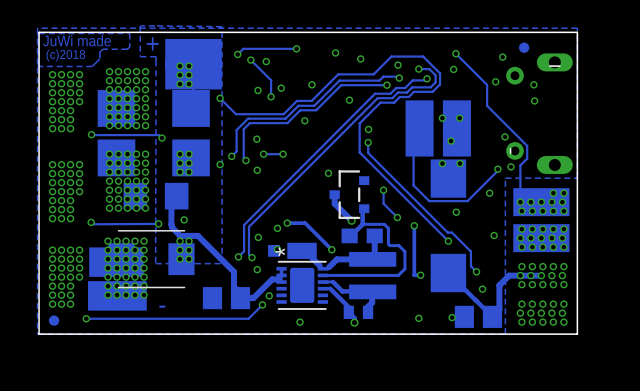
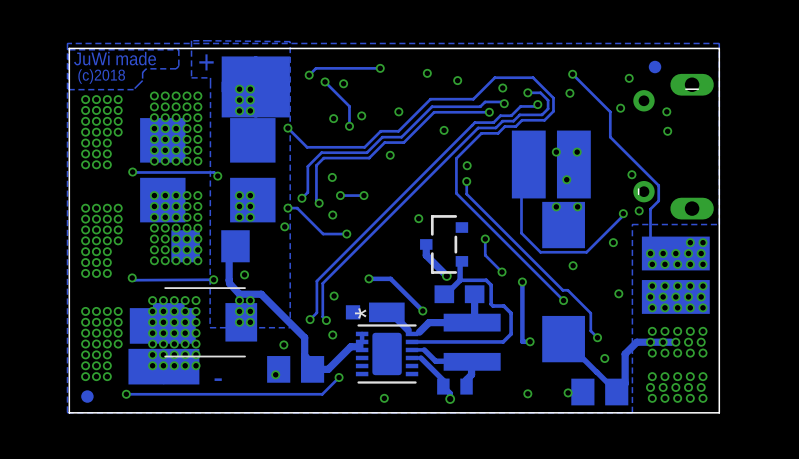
track: none -> (287, 208) (297, 208) (323, 234) (346, 234)
via: none -> (284, 226)
via: none -> (346, 234)
via: (277, 228) -> none
via: (277, 249) -> none
via: none -> (283, 344)
via: (269, 295) -> none
via: none -> (275, 374)

